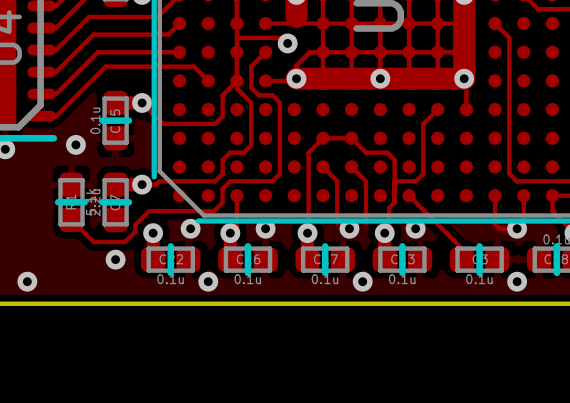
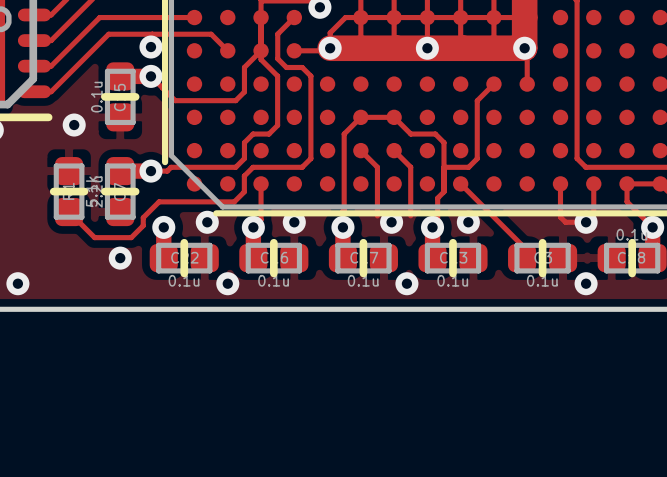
via: none -> (150, 47)

